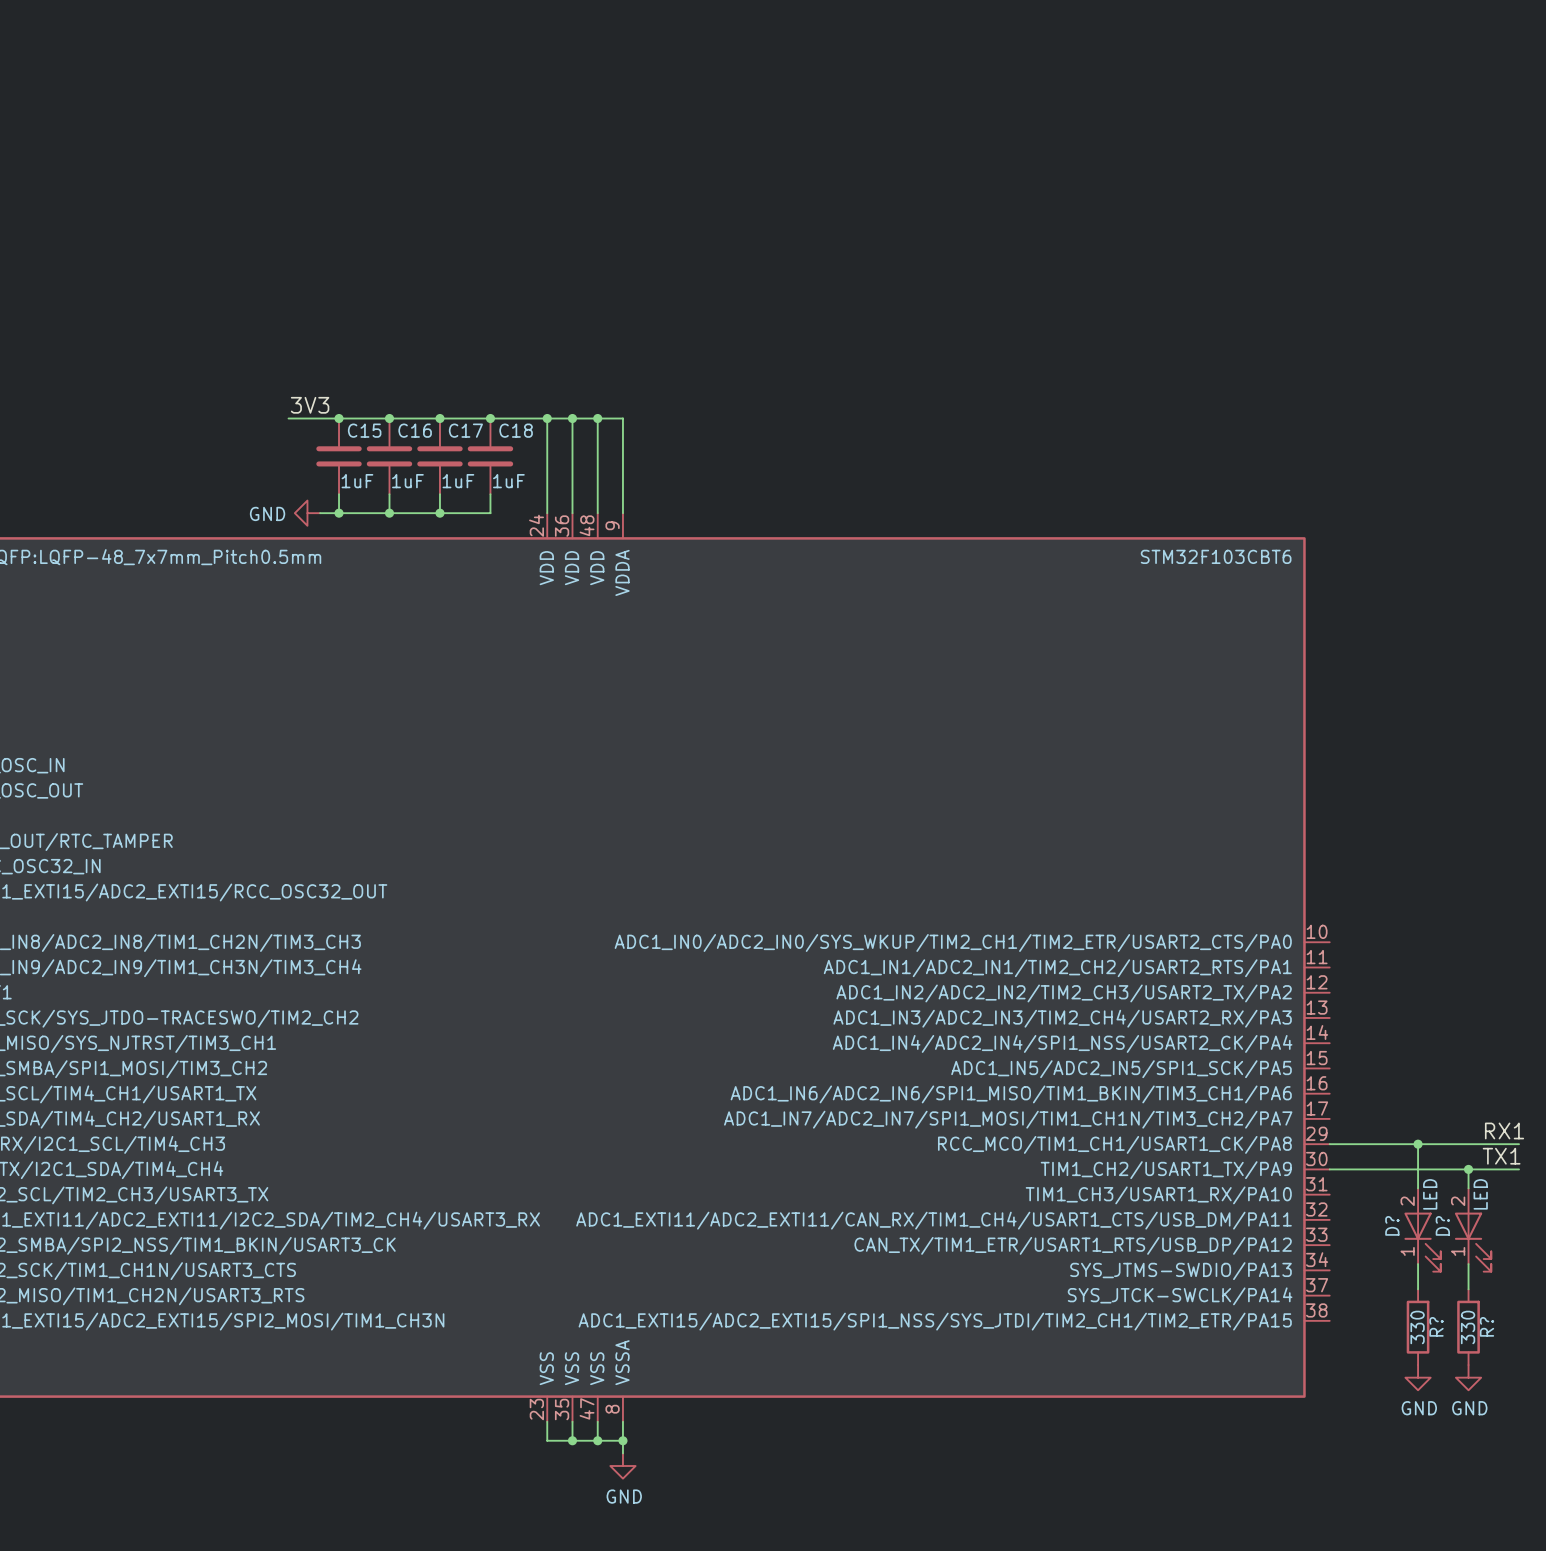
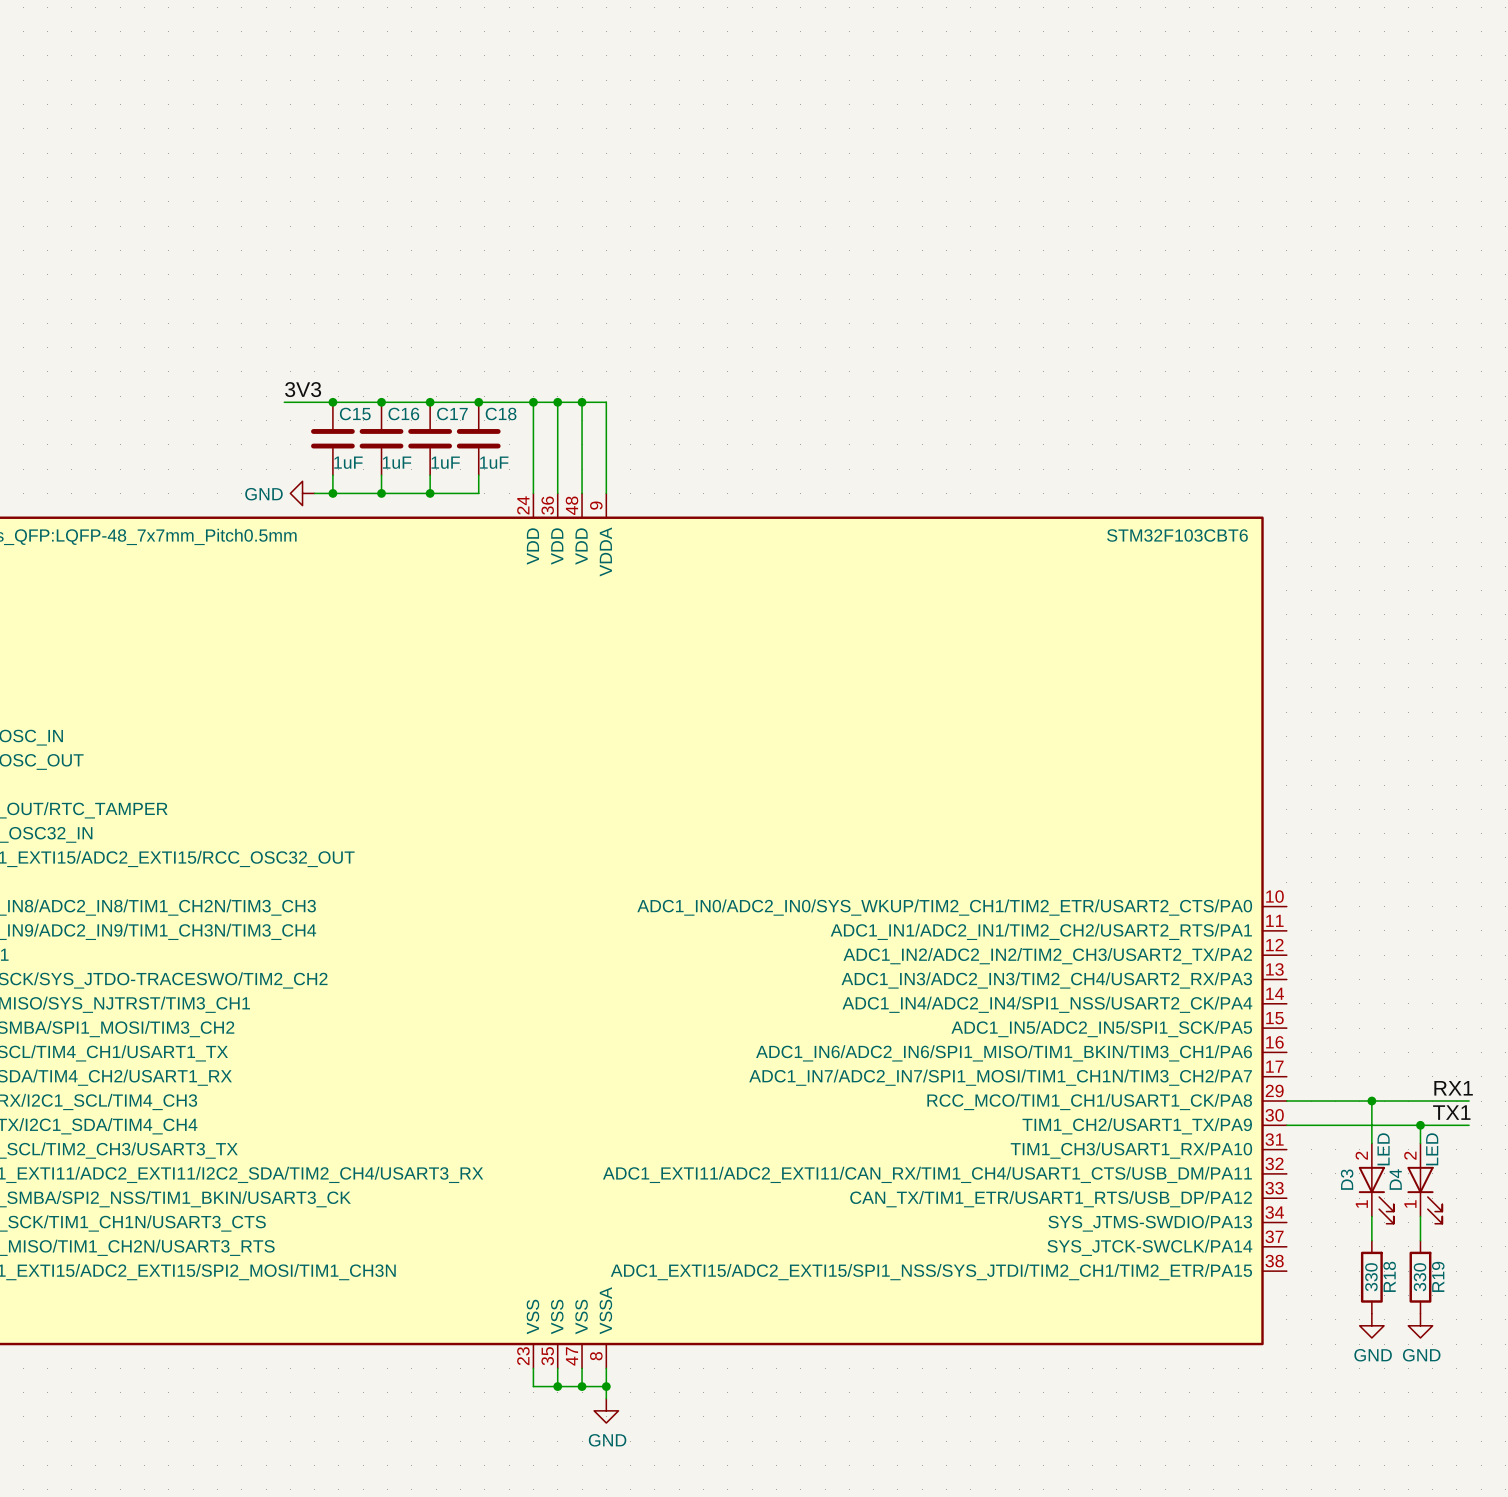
D? name: D? (1392, 1225) -> D3 (1347, 1179)
D? name: D? (1442, 1225) -> D4 (1395, 1179)
R? name: R? (1436, 1326) -> R18 (1389, 1276)
R? name: R? (1486, 1326) -> R19 (1438, 1276)

